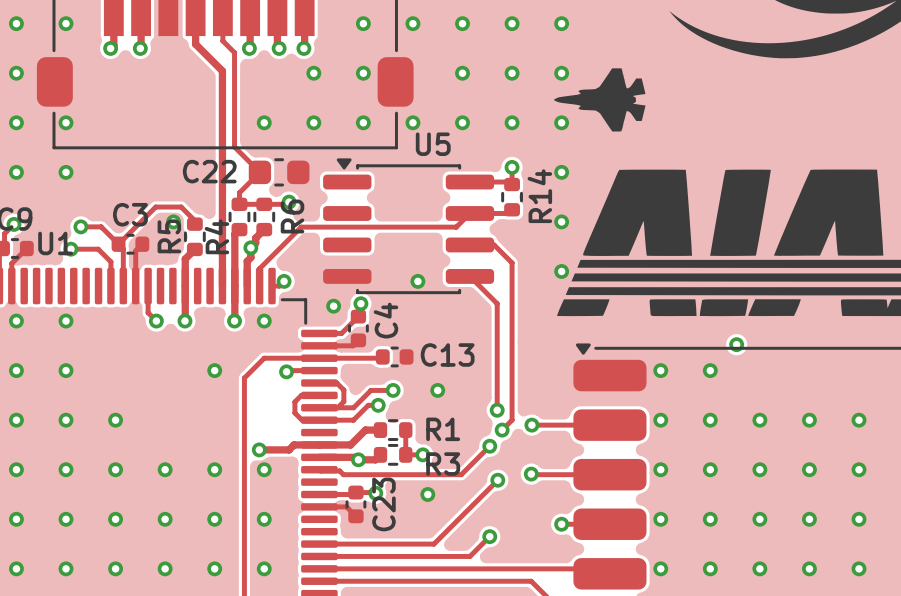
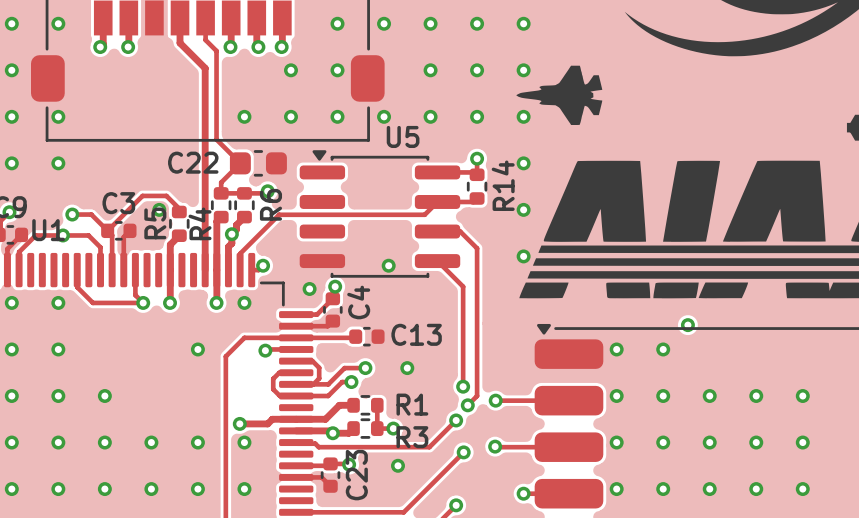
track: none -> (62, 235) (35, 235) (19, 252) (19, 270)
track: none -> (77, 270) (77, 287) (92, 302) (143, 302)

